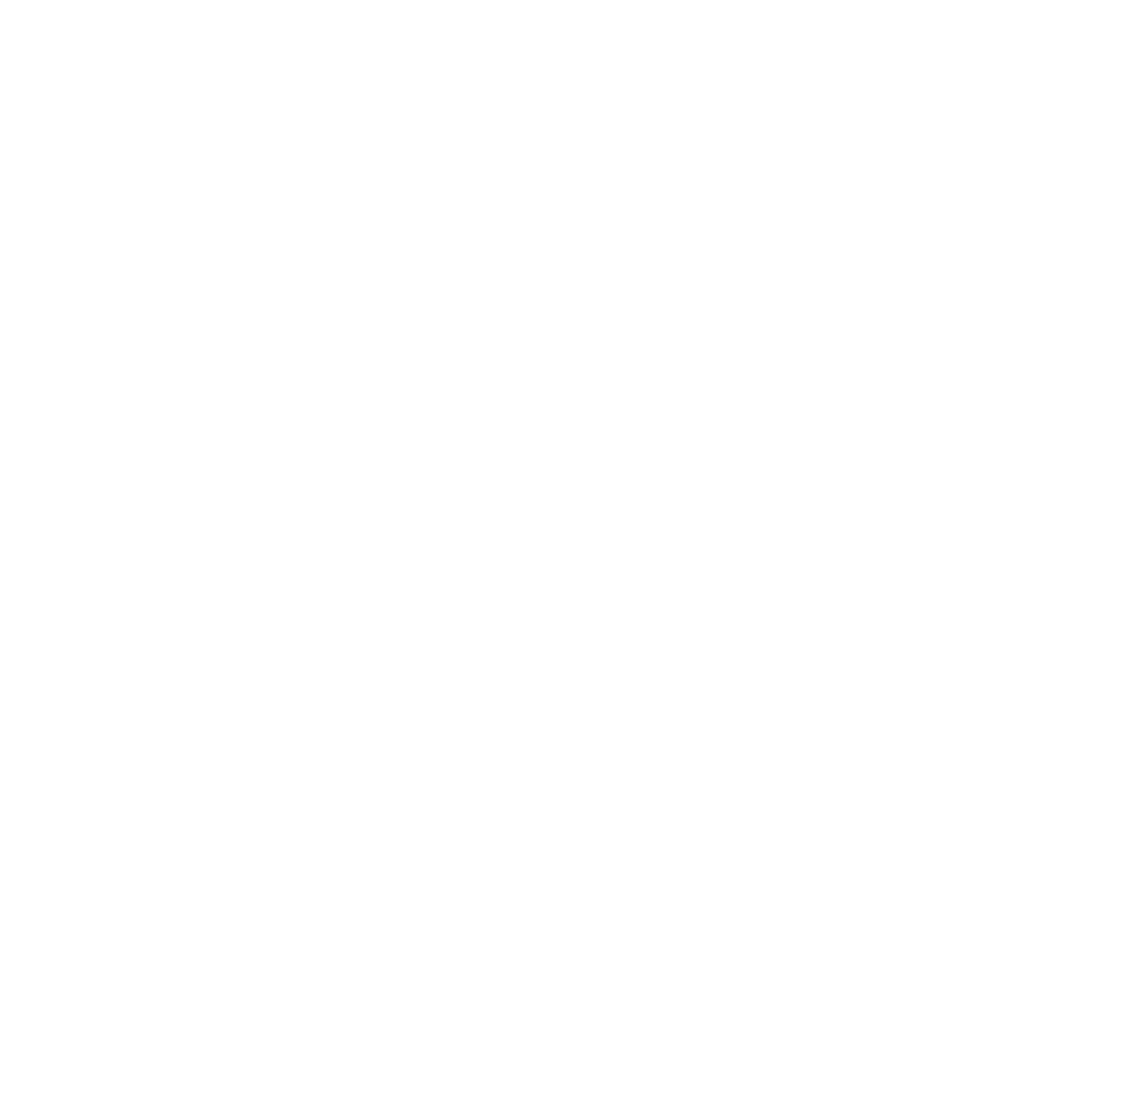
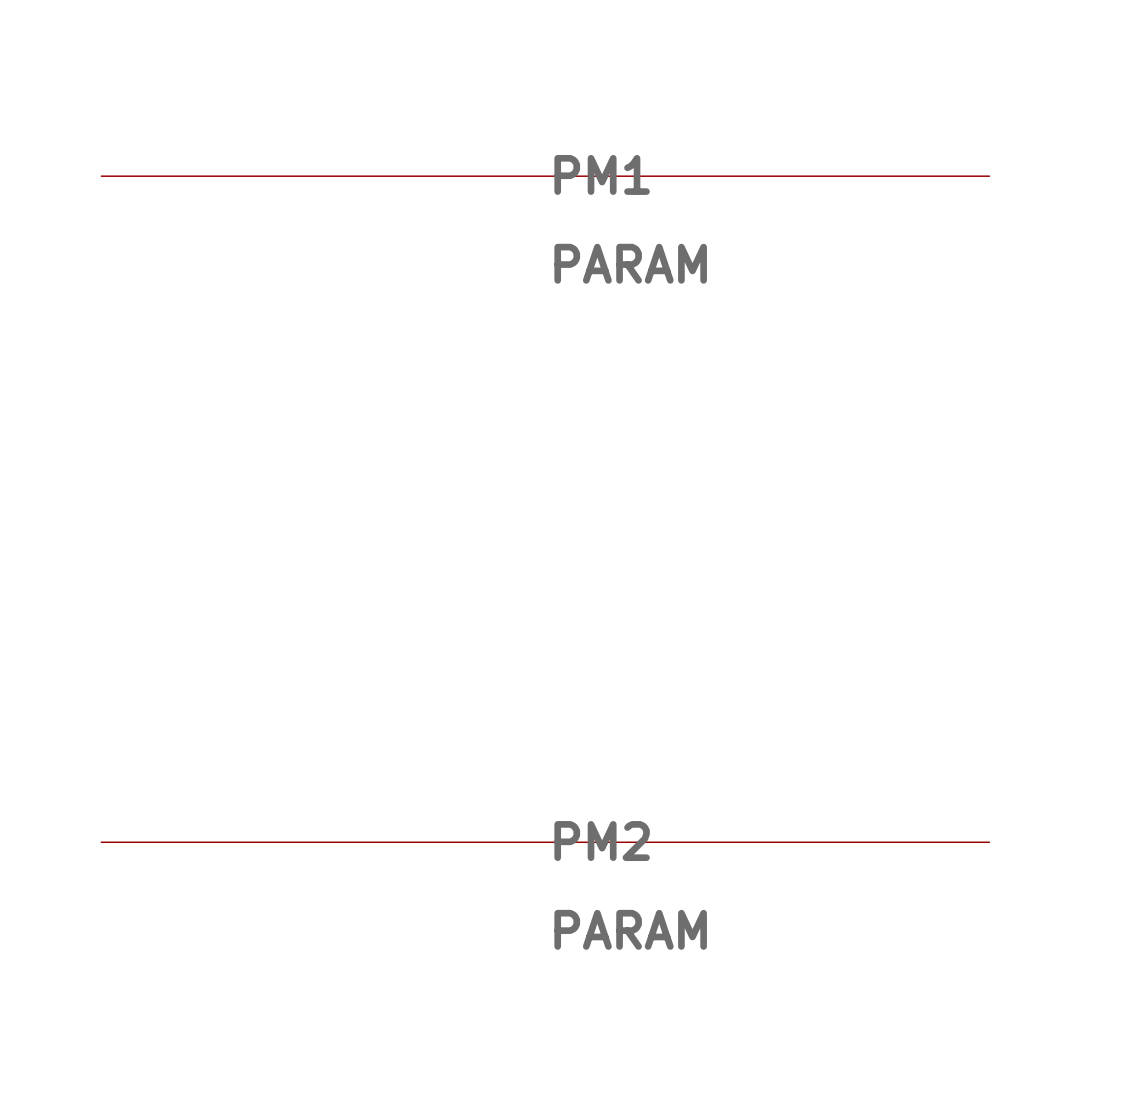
PM1: none -> PARAM (545, 176)
PM2: none -> PARAM (545, 842)

